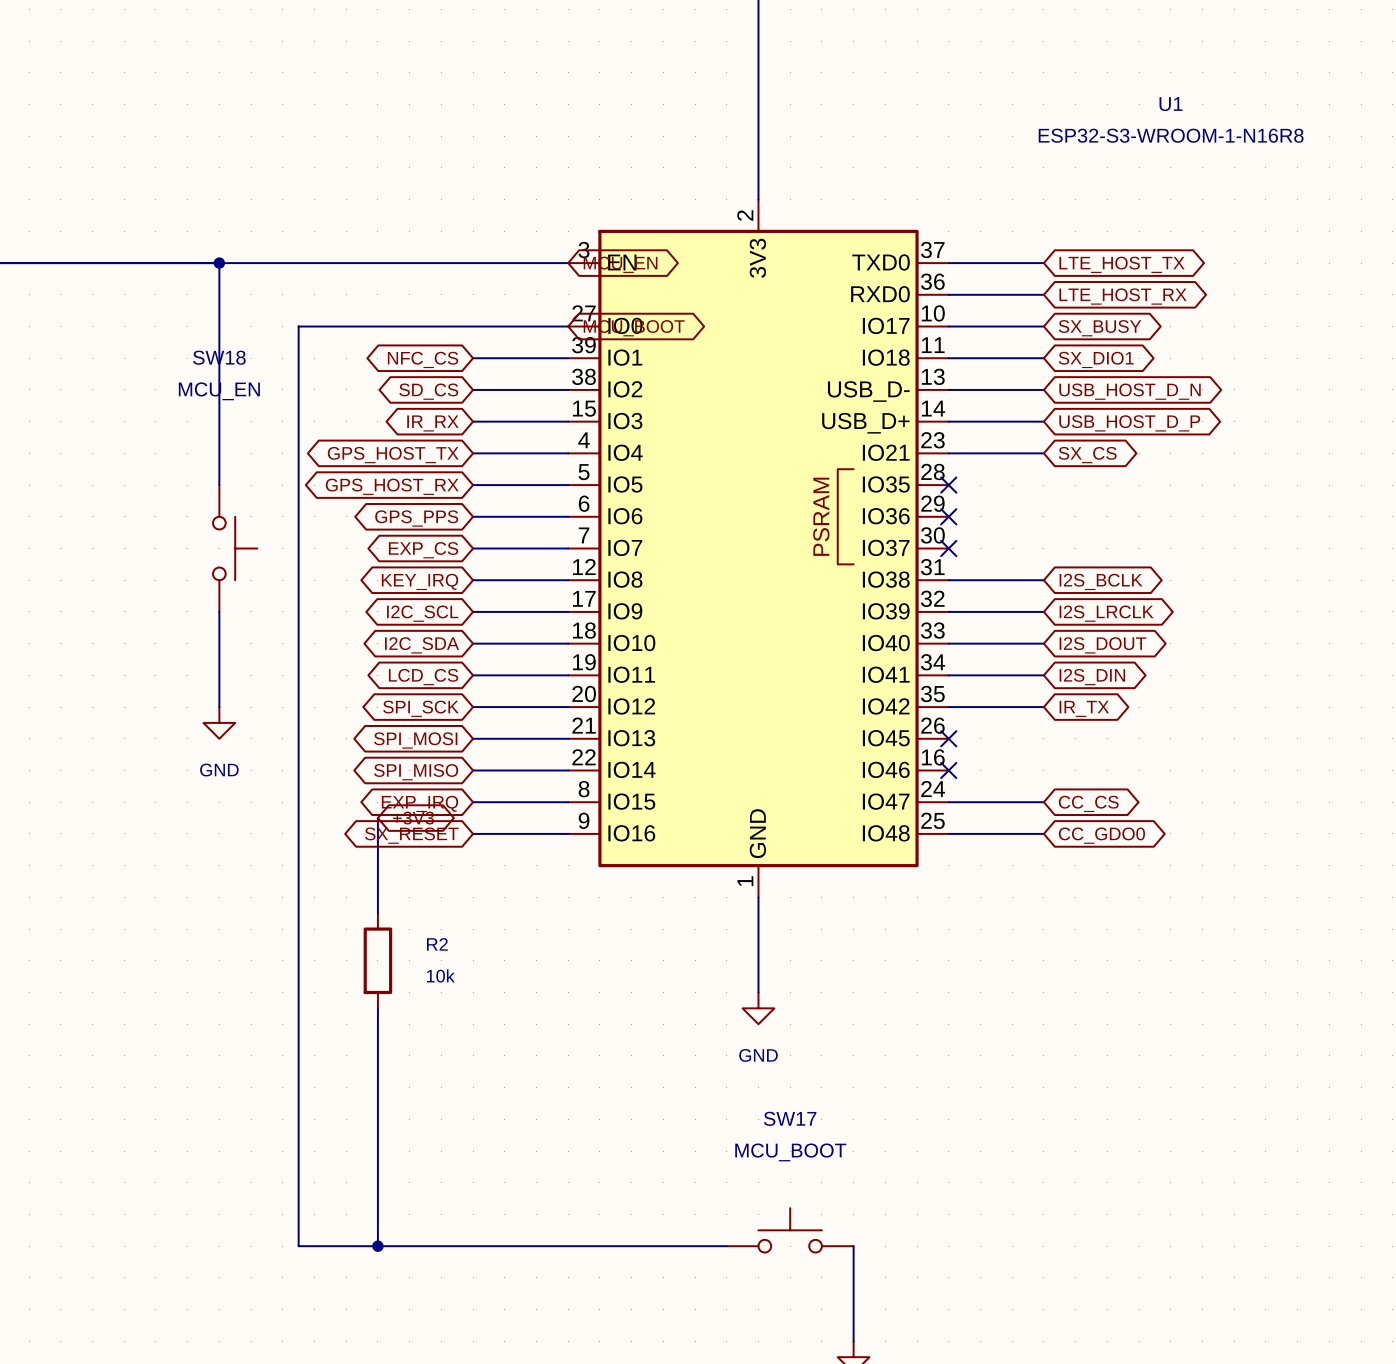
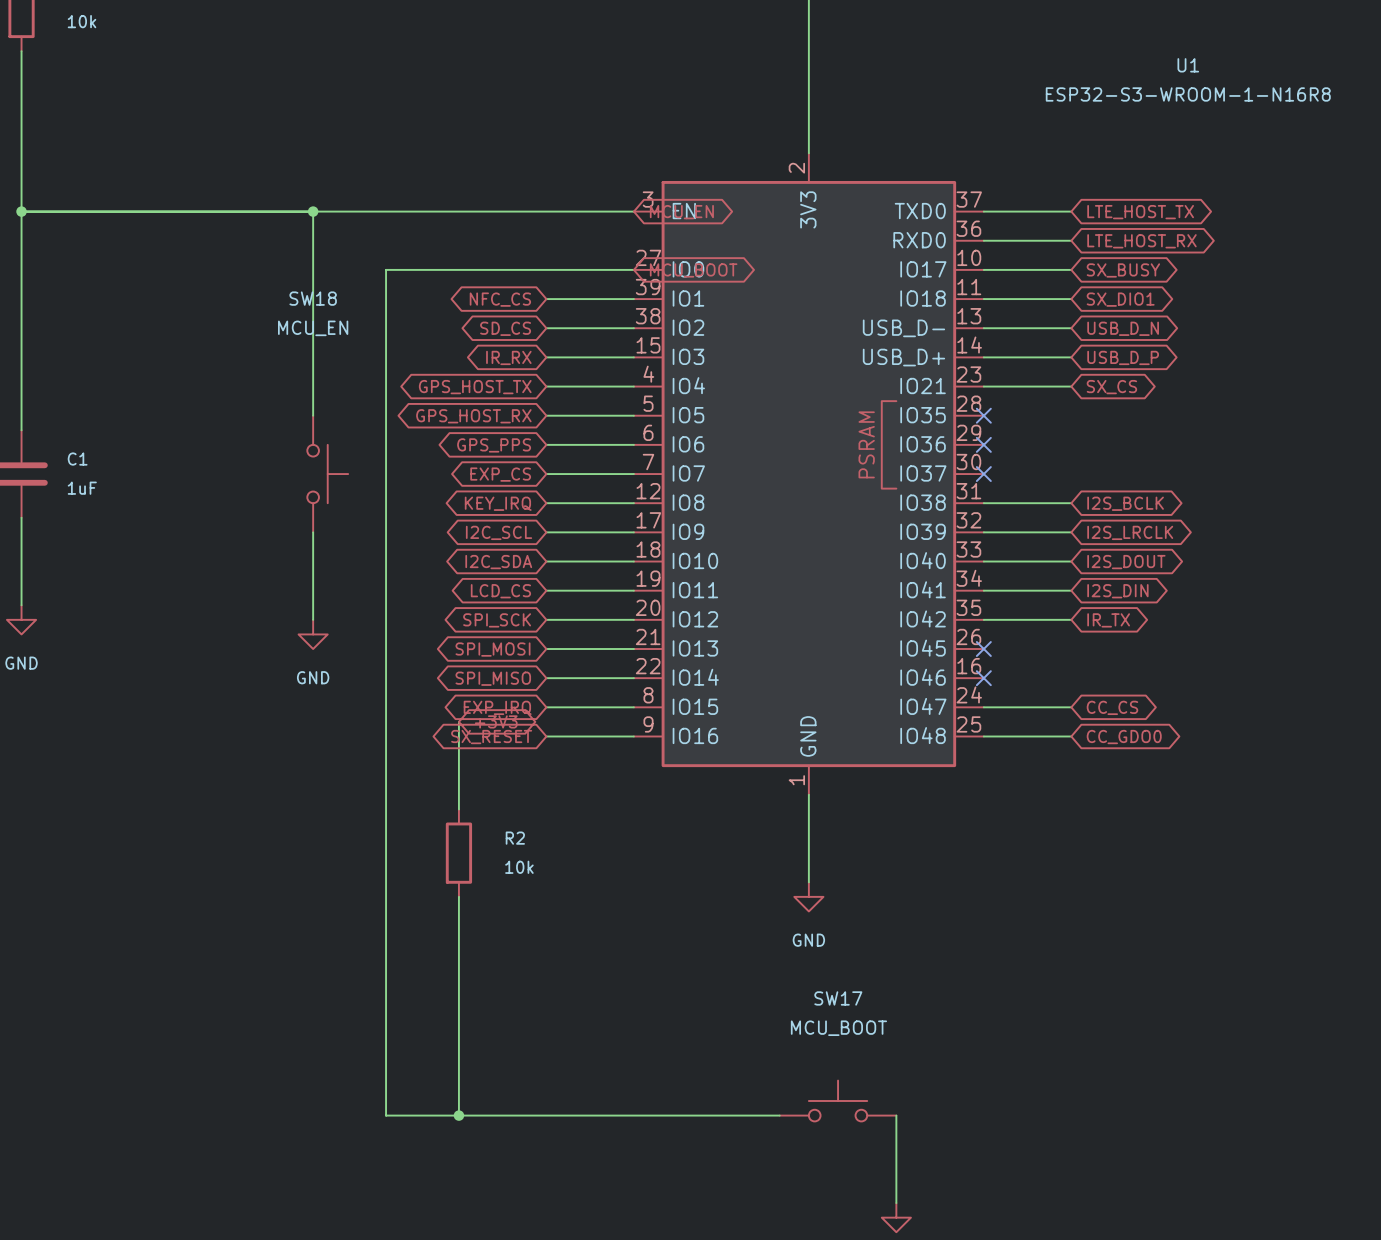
global label: USB_HOST_D_N (1130, 391) -> USB_D_N (1123, 328)
global label: USB_HOST_D_P (1129, 423) -> USB_D_P (1123, 357)

